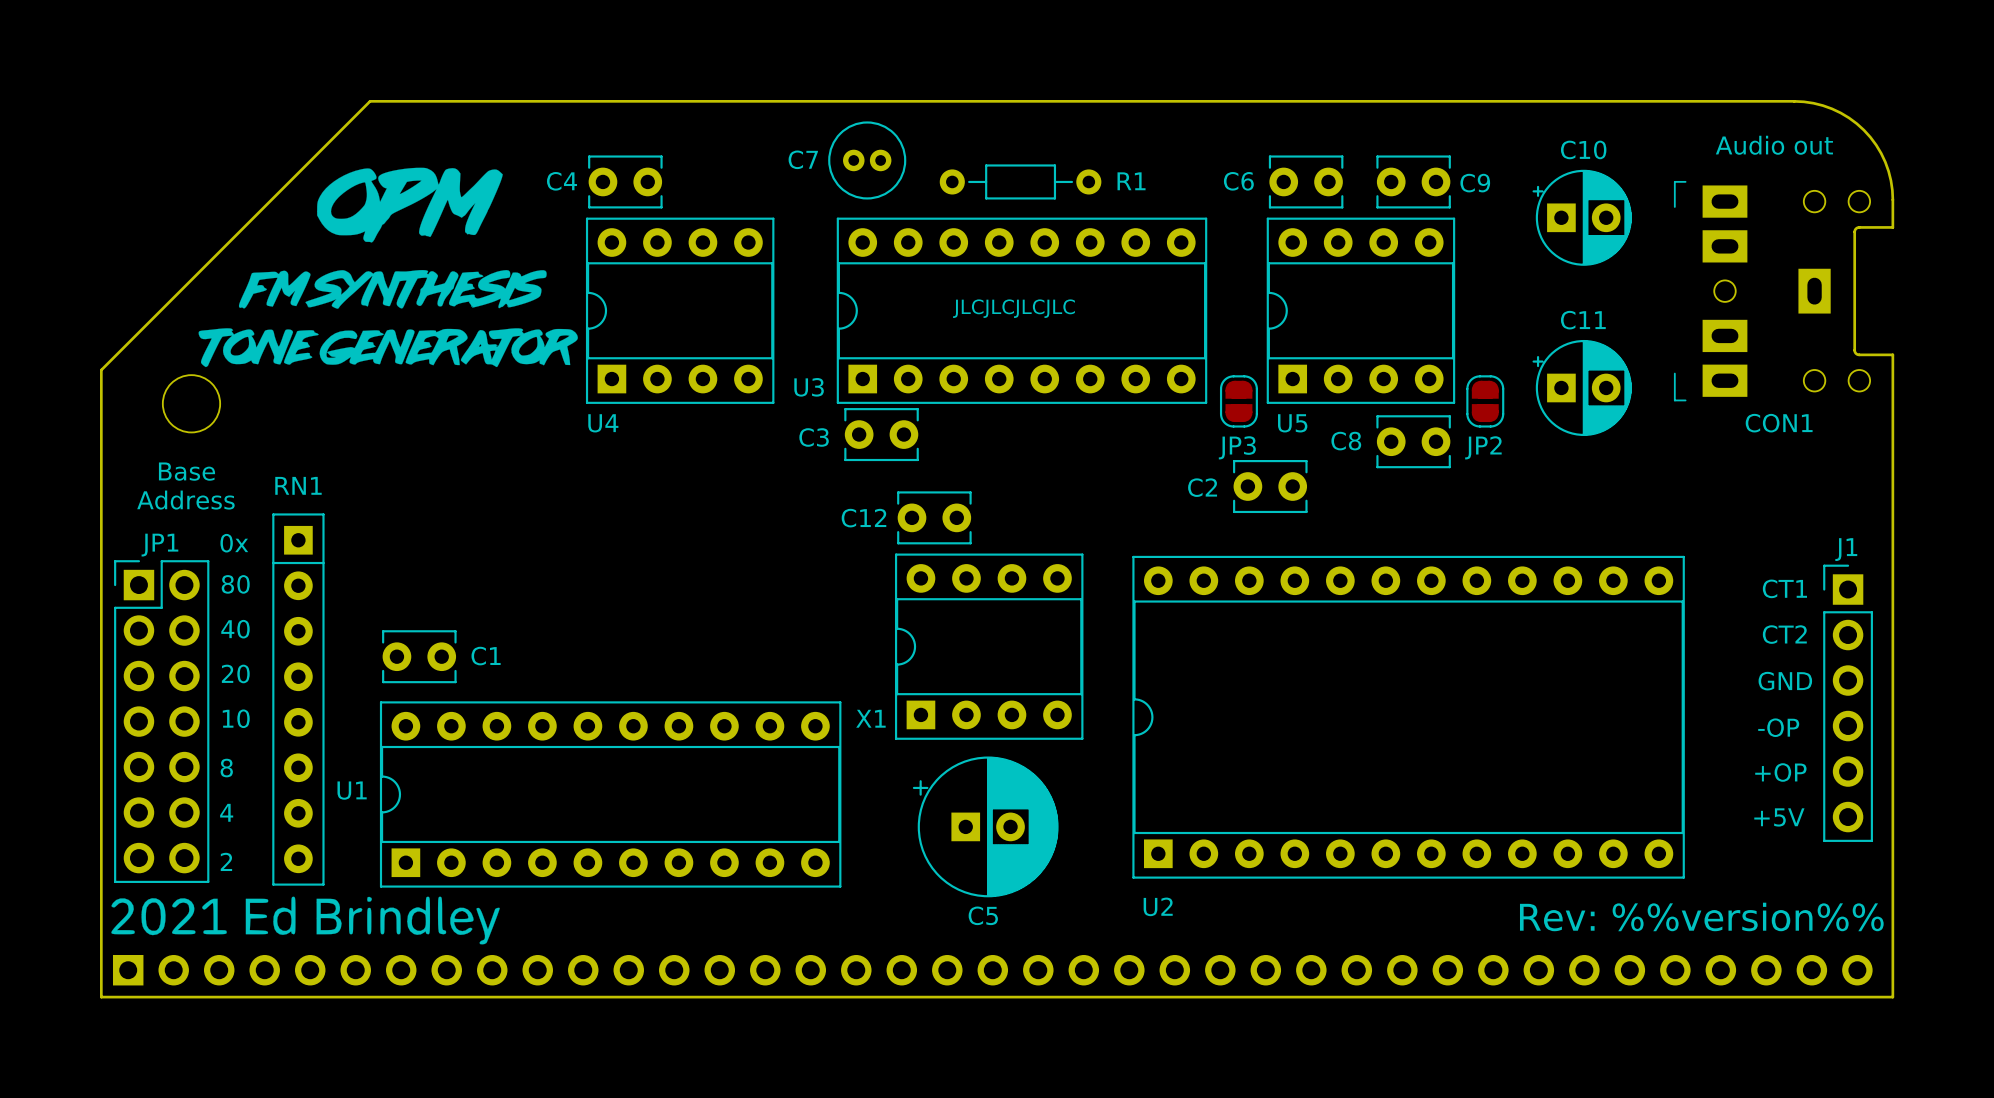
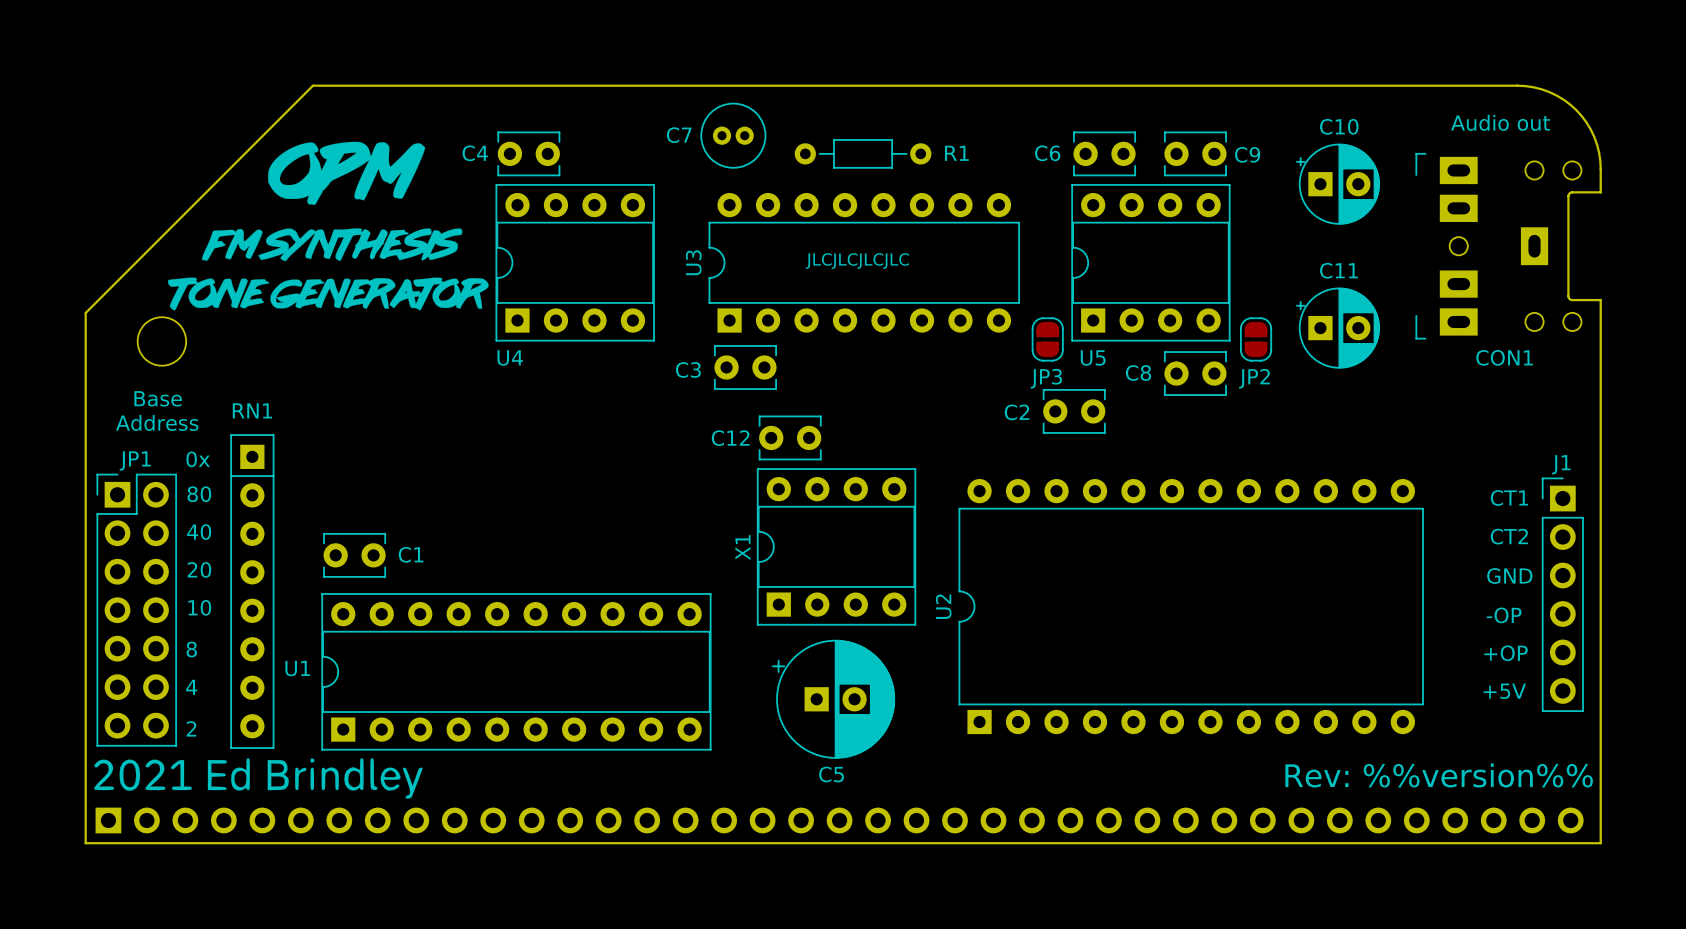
U3 footprint: [836, 217, 1208, 404] -> [708, 192, 1021, 333]
U3 name position: U3 (809, 387) -> U3 (693, 262)
U2 footprint: [1132, 555, 1685, 879] -> [958, 479, 1424, 735]
X1 name rotation: 0° (870, 718) -> 90° counterclockwise (742, 547)
X1 name position: X1 (870, 718) -> X1 (742, 547)
U2 name position: U2 (1158, 906) -> U2 (943, 606)

